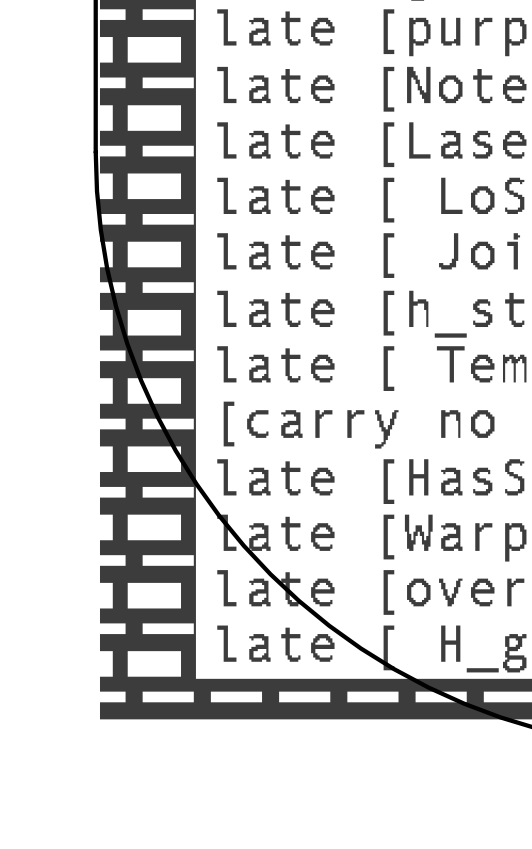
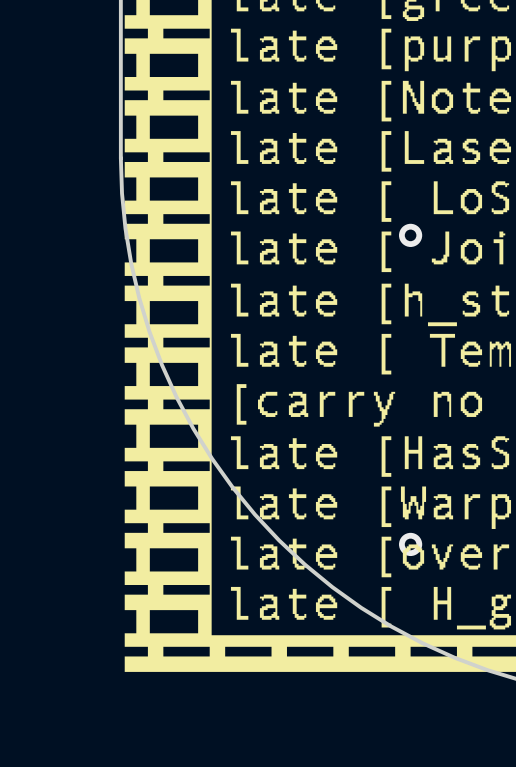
via: none -> (410, 235)
via: none -> (410, 544)

